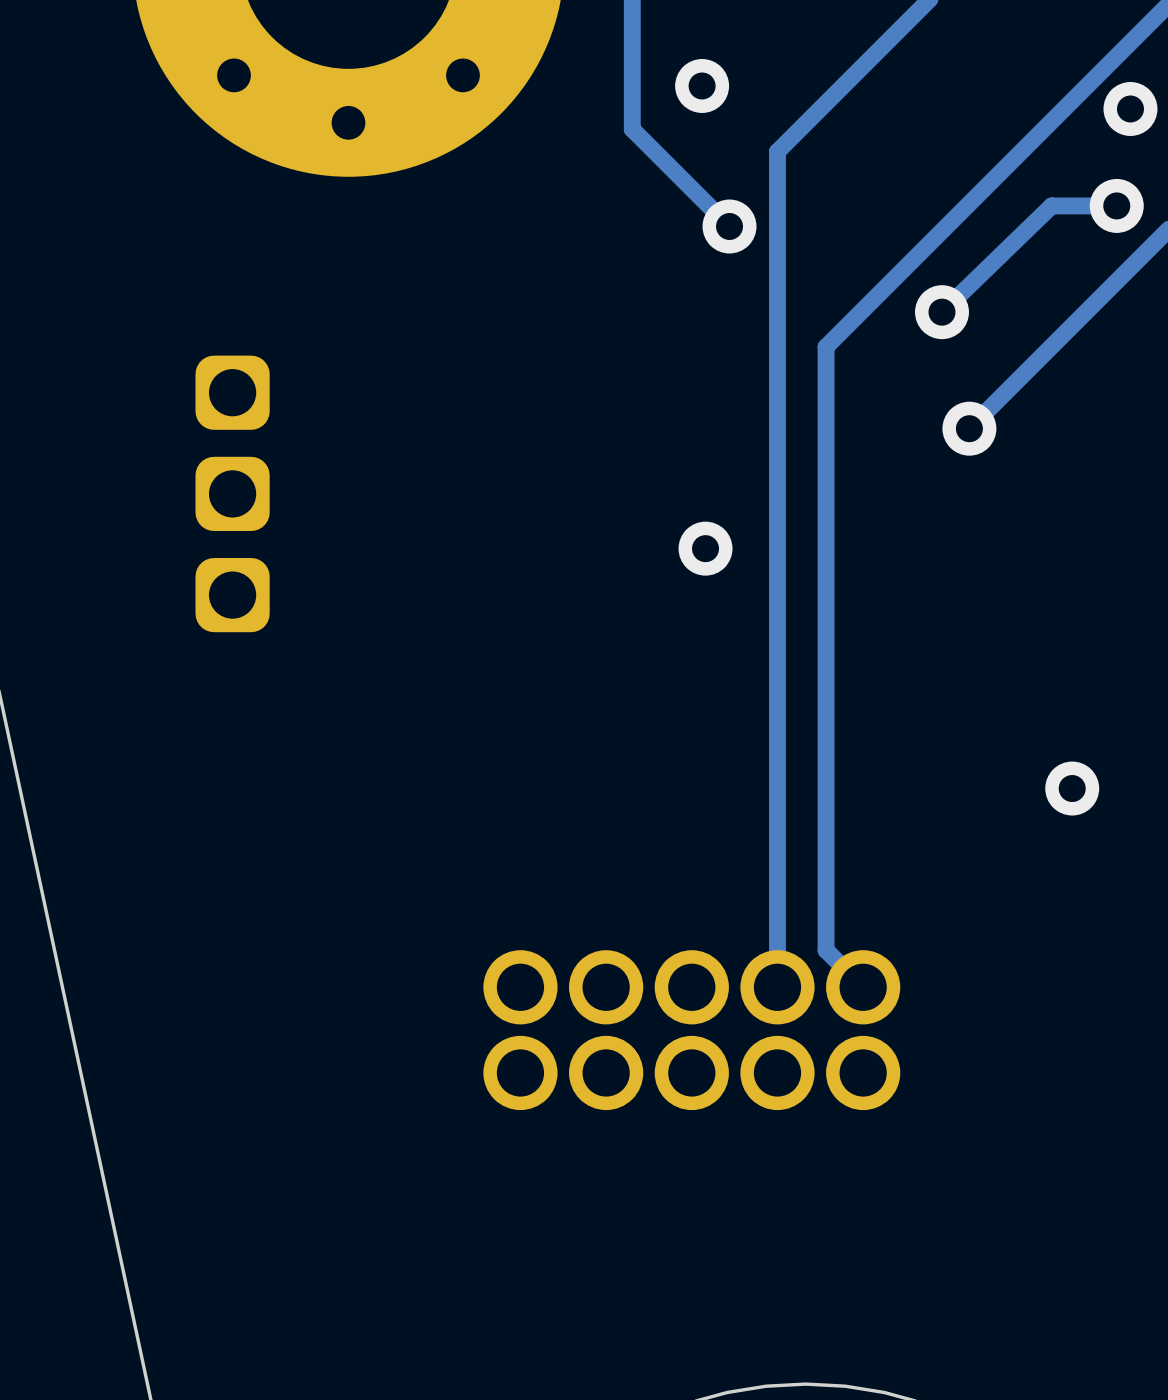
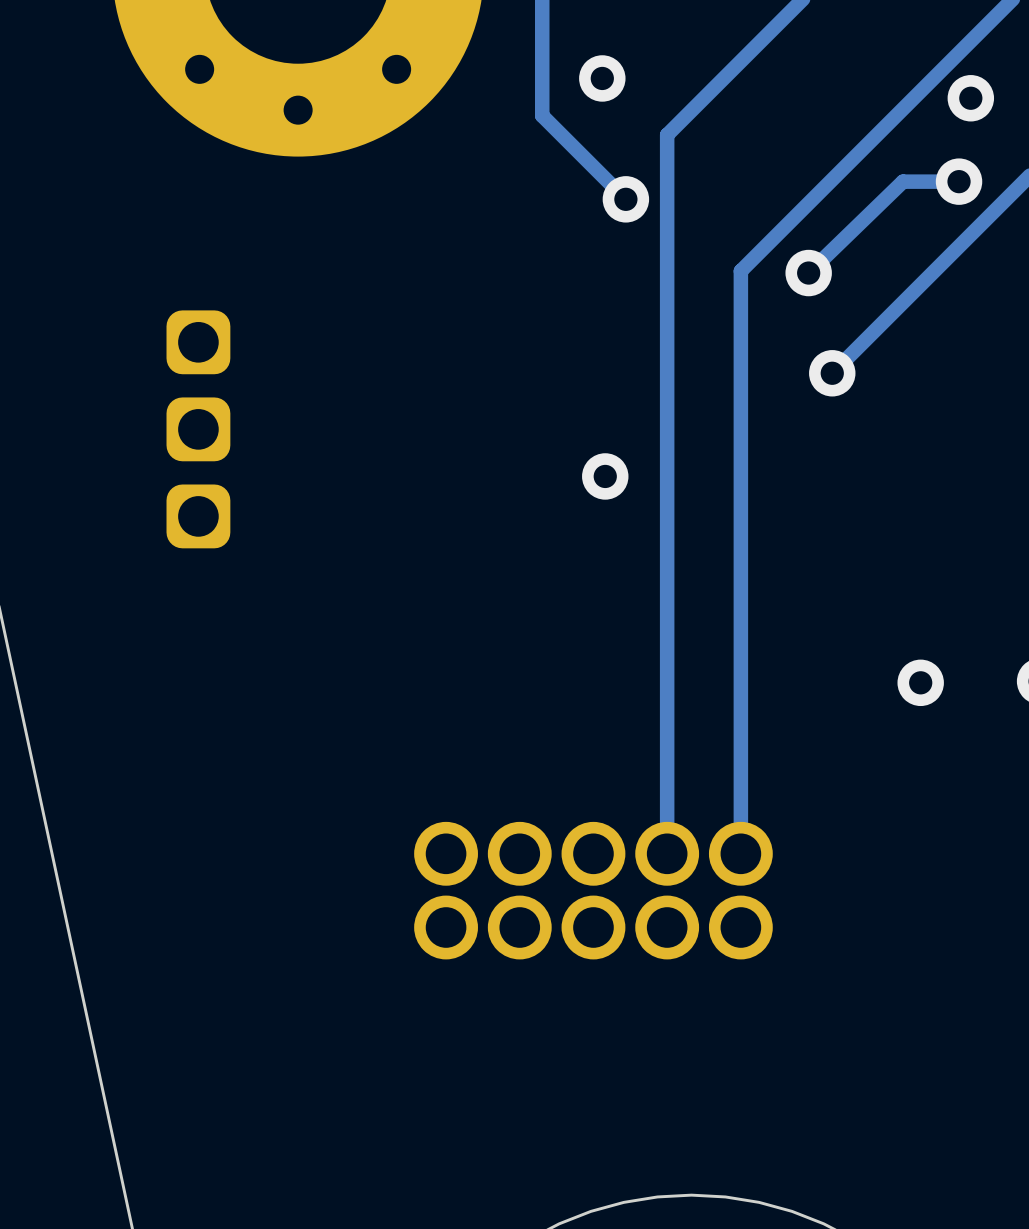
track: (863, 309) (826, 346) (826, 950) (863, 987) -> (740, 271) (740, 853)

